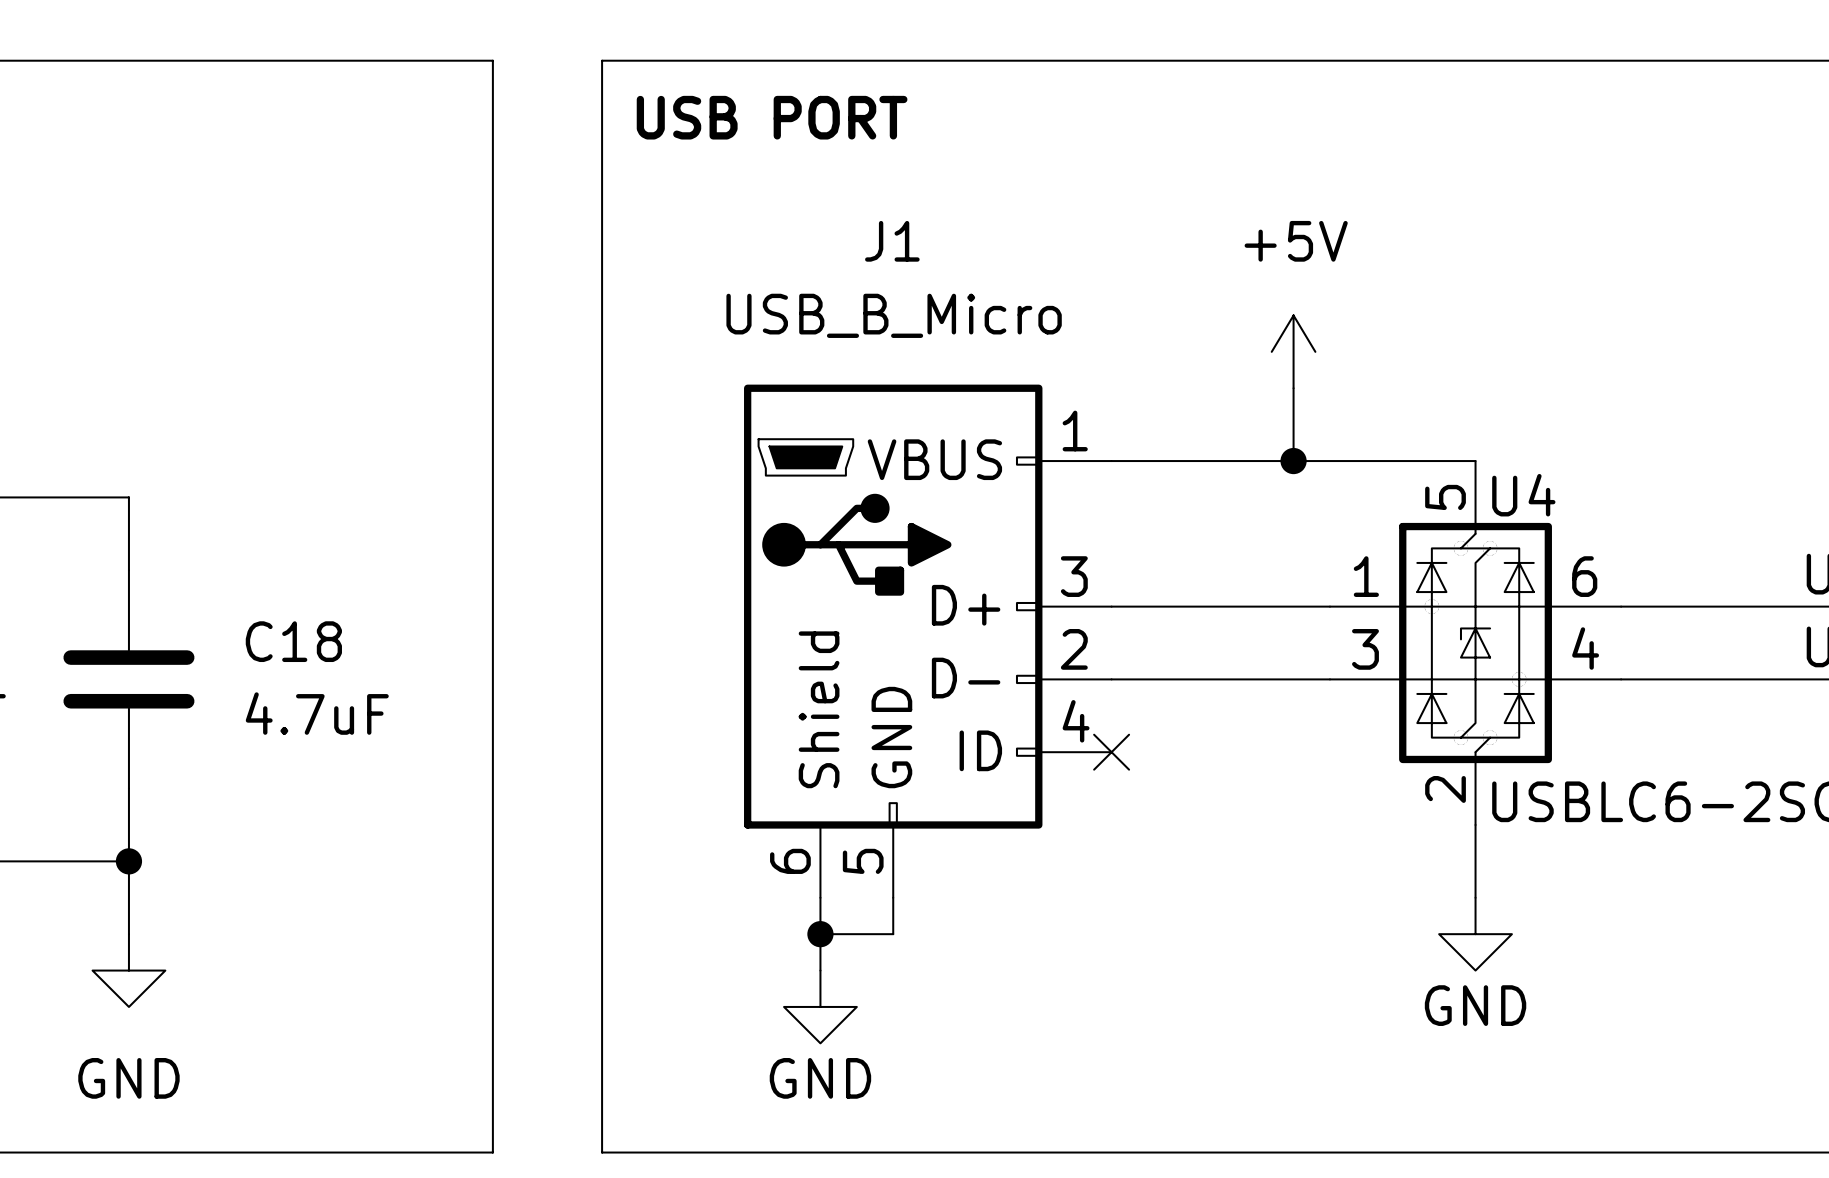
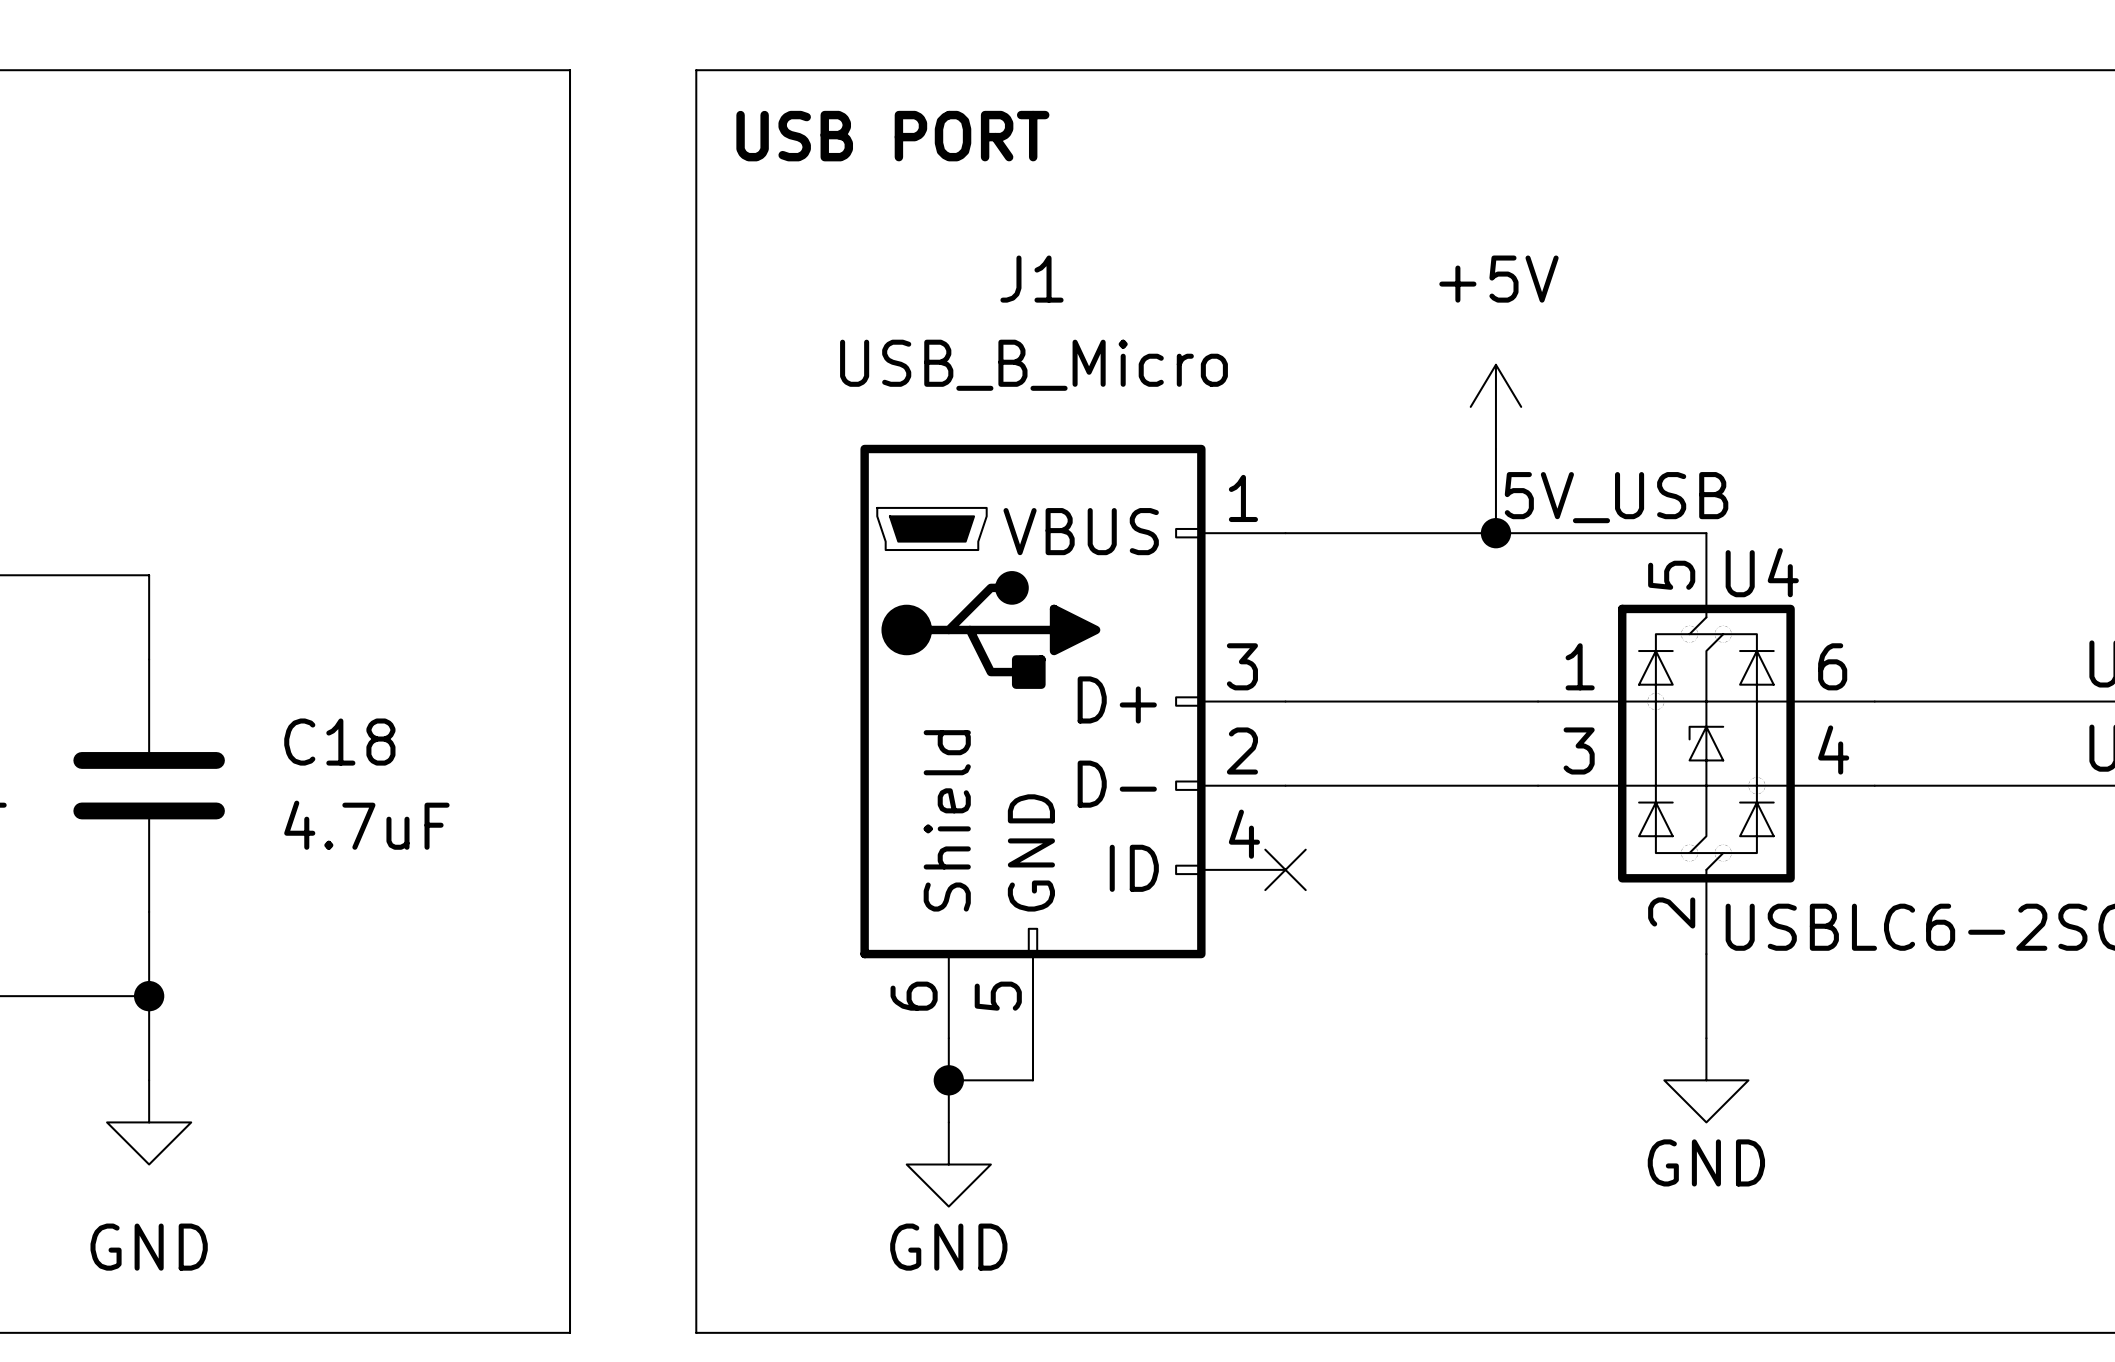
label: none -> 5V_USB (1616, 497)

